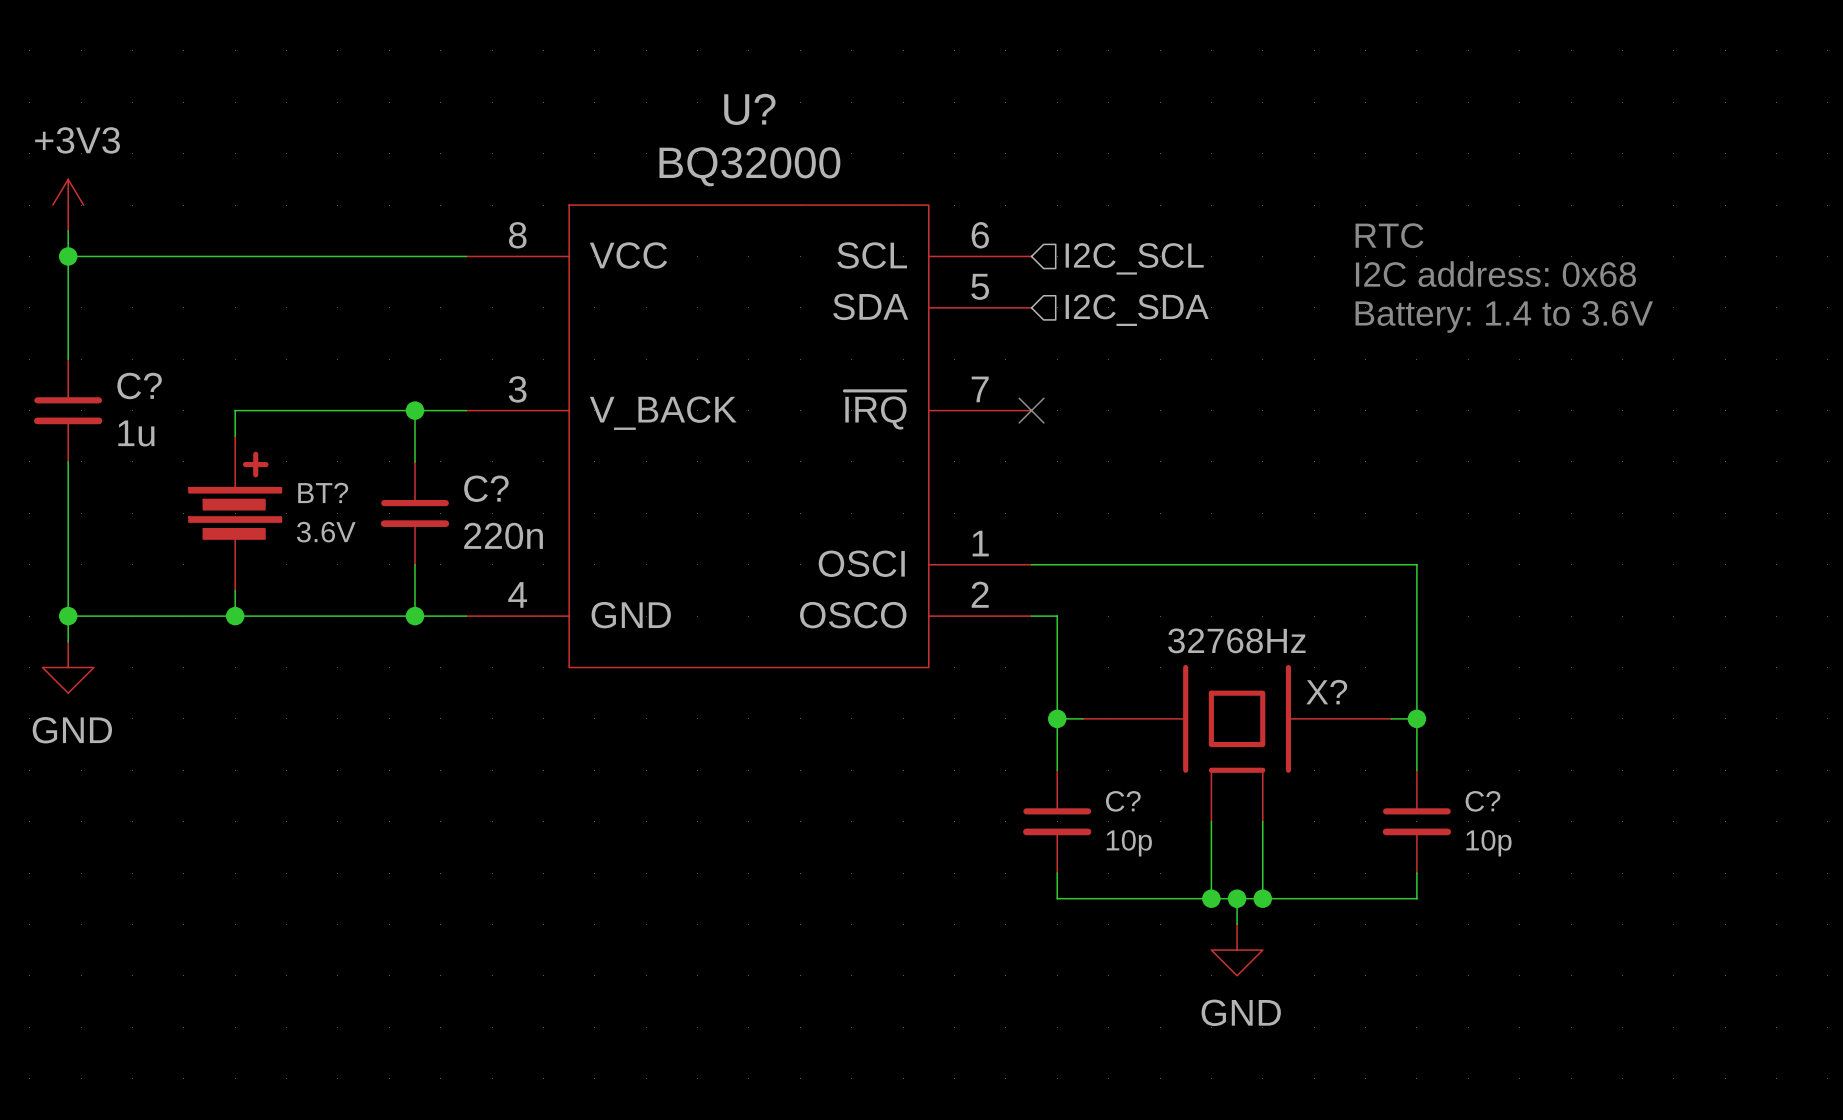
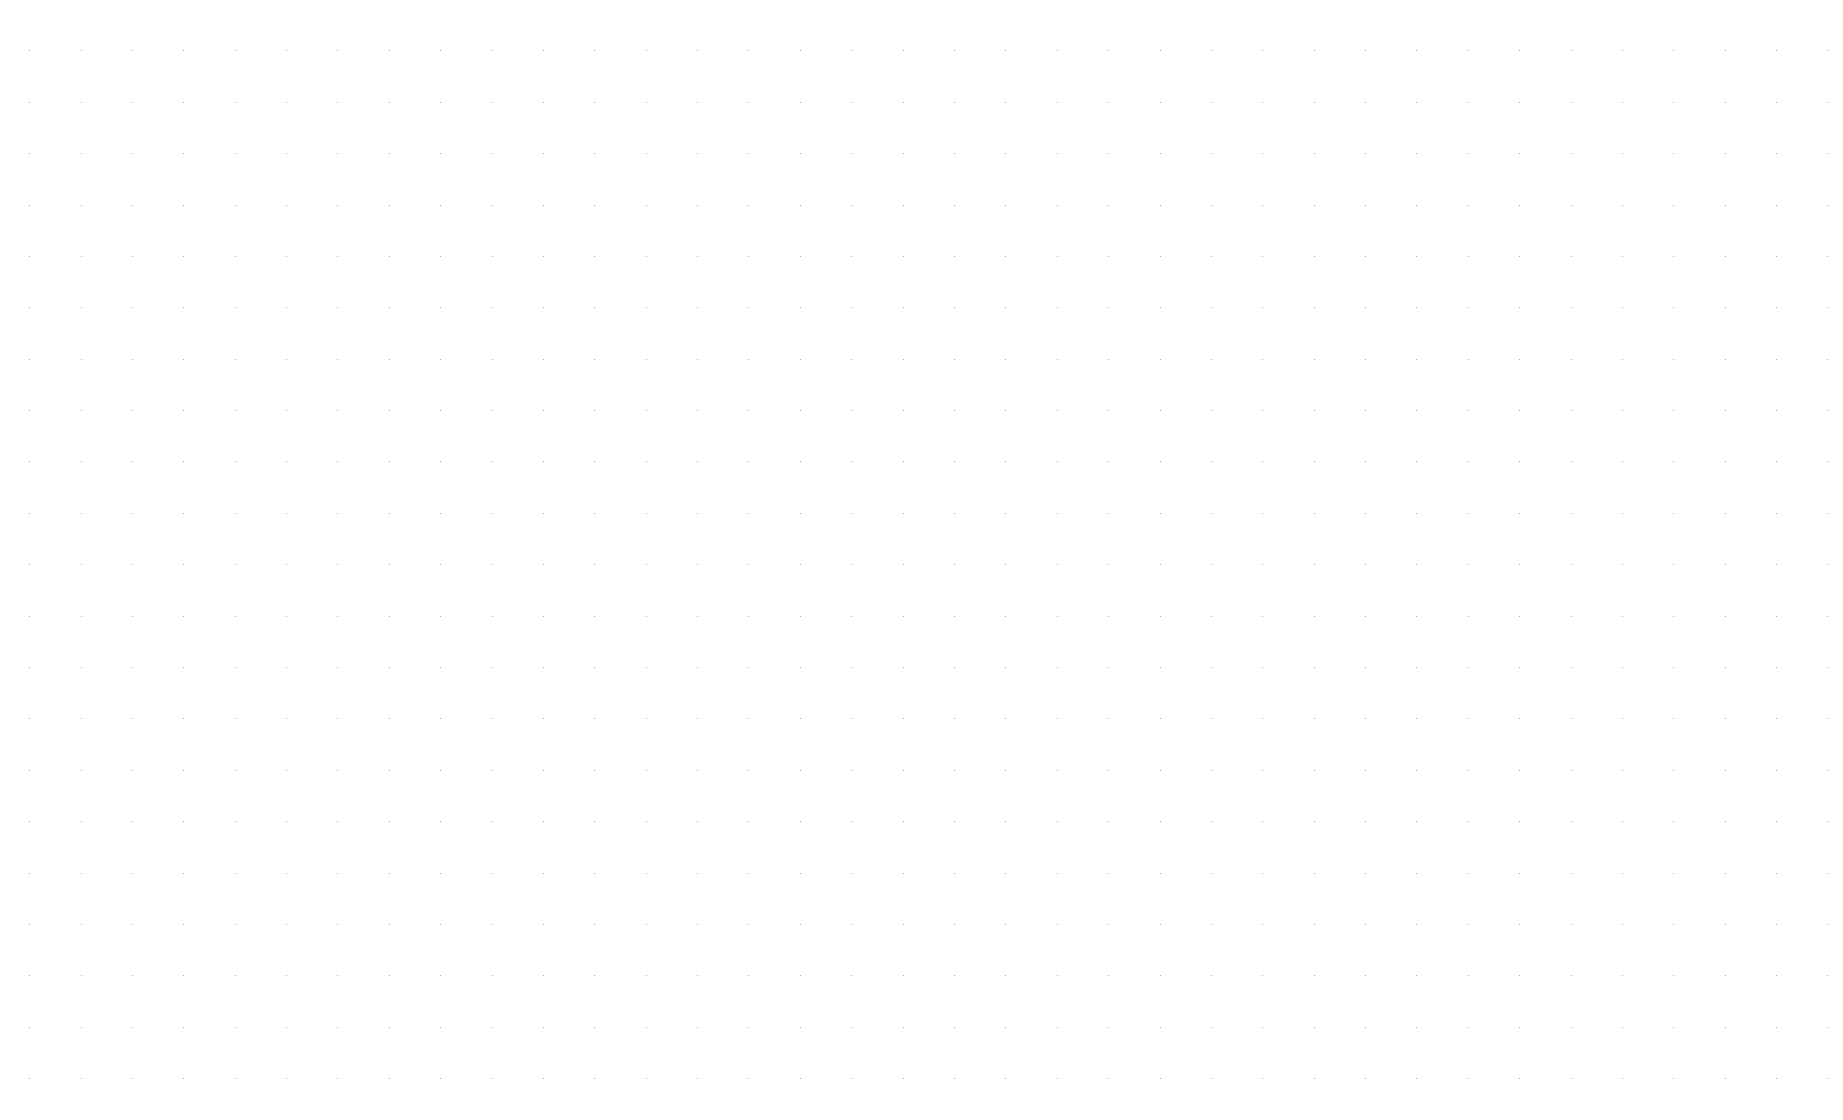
power symbol: +3V3 (68, 205) -> none
wire: (68, 230) (68, 359) -> none
text: RTC (1389, 235) -> none
wire: (68, 256) (466, 256) -> none
junction: (68, 256) -> none
hierarchical label: I2C_SCL (1134, 258) -> none
text: I2C address: 0x68 (1495, 274) -> none
hierarchical label: I2C_SDA (1137, 310) -> none
text: Battery: 1.4 to 3.6V (1504, 316) -> none
C?: 1u (68, 410) -> none
wire: (415, 410) (415, 461) -> none
junction: (415, 410) -> none
wire: (466, 410) (235, 410) (235, 436) -> none
no-connect mark: (1031, 410) -> none
U?: BQ32000 (748, 436) -> none
wire: (68, 461) (68, 641) -> none
BT?: 3.6V (235, 513) -> none
C?: 220n (415, 513) -> none
wire: (415, 564) (415, 616) -> none
wire: (1031, 564) (1416, 564) (1416, 770) -> none
wire: (235, 590) (235, 616) -> none
wire: (68, 616) (466, 616) -> none
junction: (68, 616) -> none
junction: (235, 616) -> none
junction: (415, 616) -> none
wire: (1031, 616) (1057, 616) (1057, 770) -> none
power symbol: GND (68, 667) -> none
wire: (1057, 718) (1082, 718) -> none
junction: (1057, 718) -> none
wire: (1391, 718) (1416, 718) -> none
junction: (1416, 718) -> none
X?: 32768Hz (1237, 743) -> none
C?: 10p (1057, 821) -> none
wire: (1211, 821) (1211, 898) -> none
wire: (1262, 821) (1262, 898) -> none
C?: 10p (1416, 821) -> none
wire: (1057, 873) (1057, 898) (1416, 898) (1416, 873) -> none
junction: (1211, 898) -> none
wire: (1237, 898) (1237, 924) -> none
junction: (1237, 898) -> none
junction: (1262, 898) -> none
power symbol: GND (1237, 950) -> none

